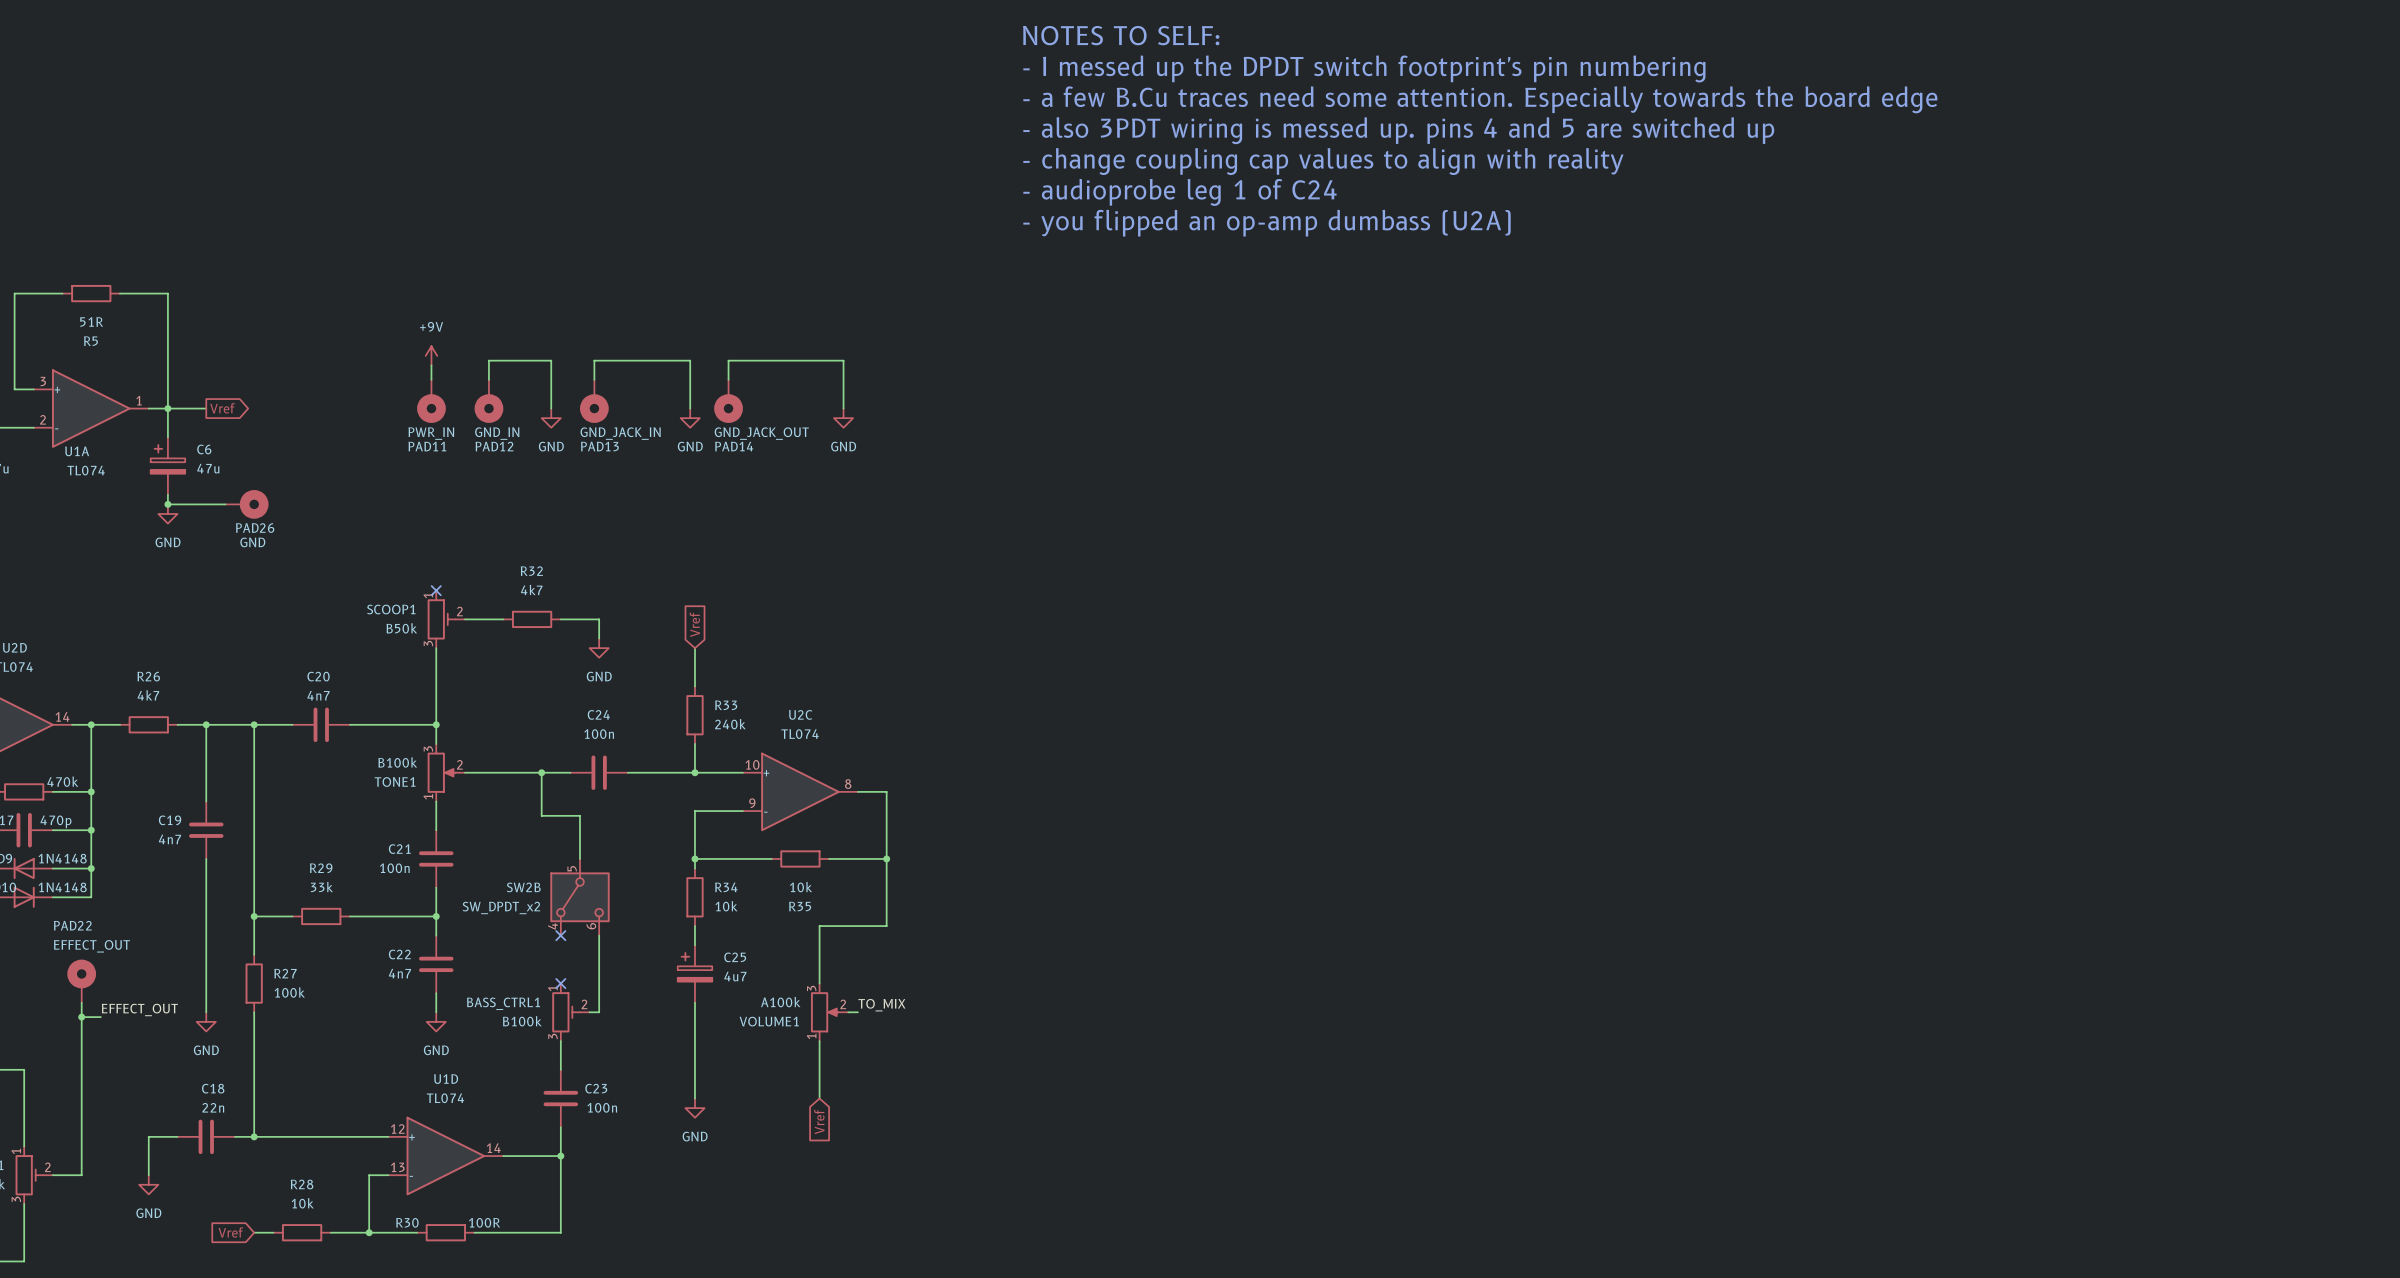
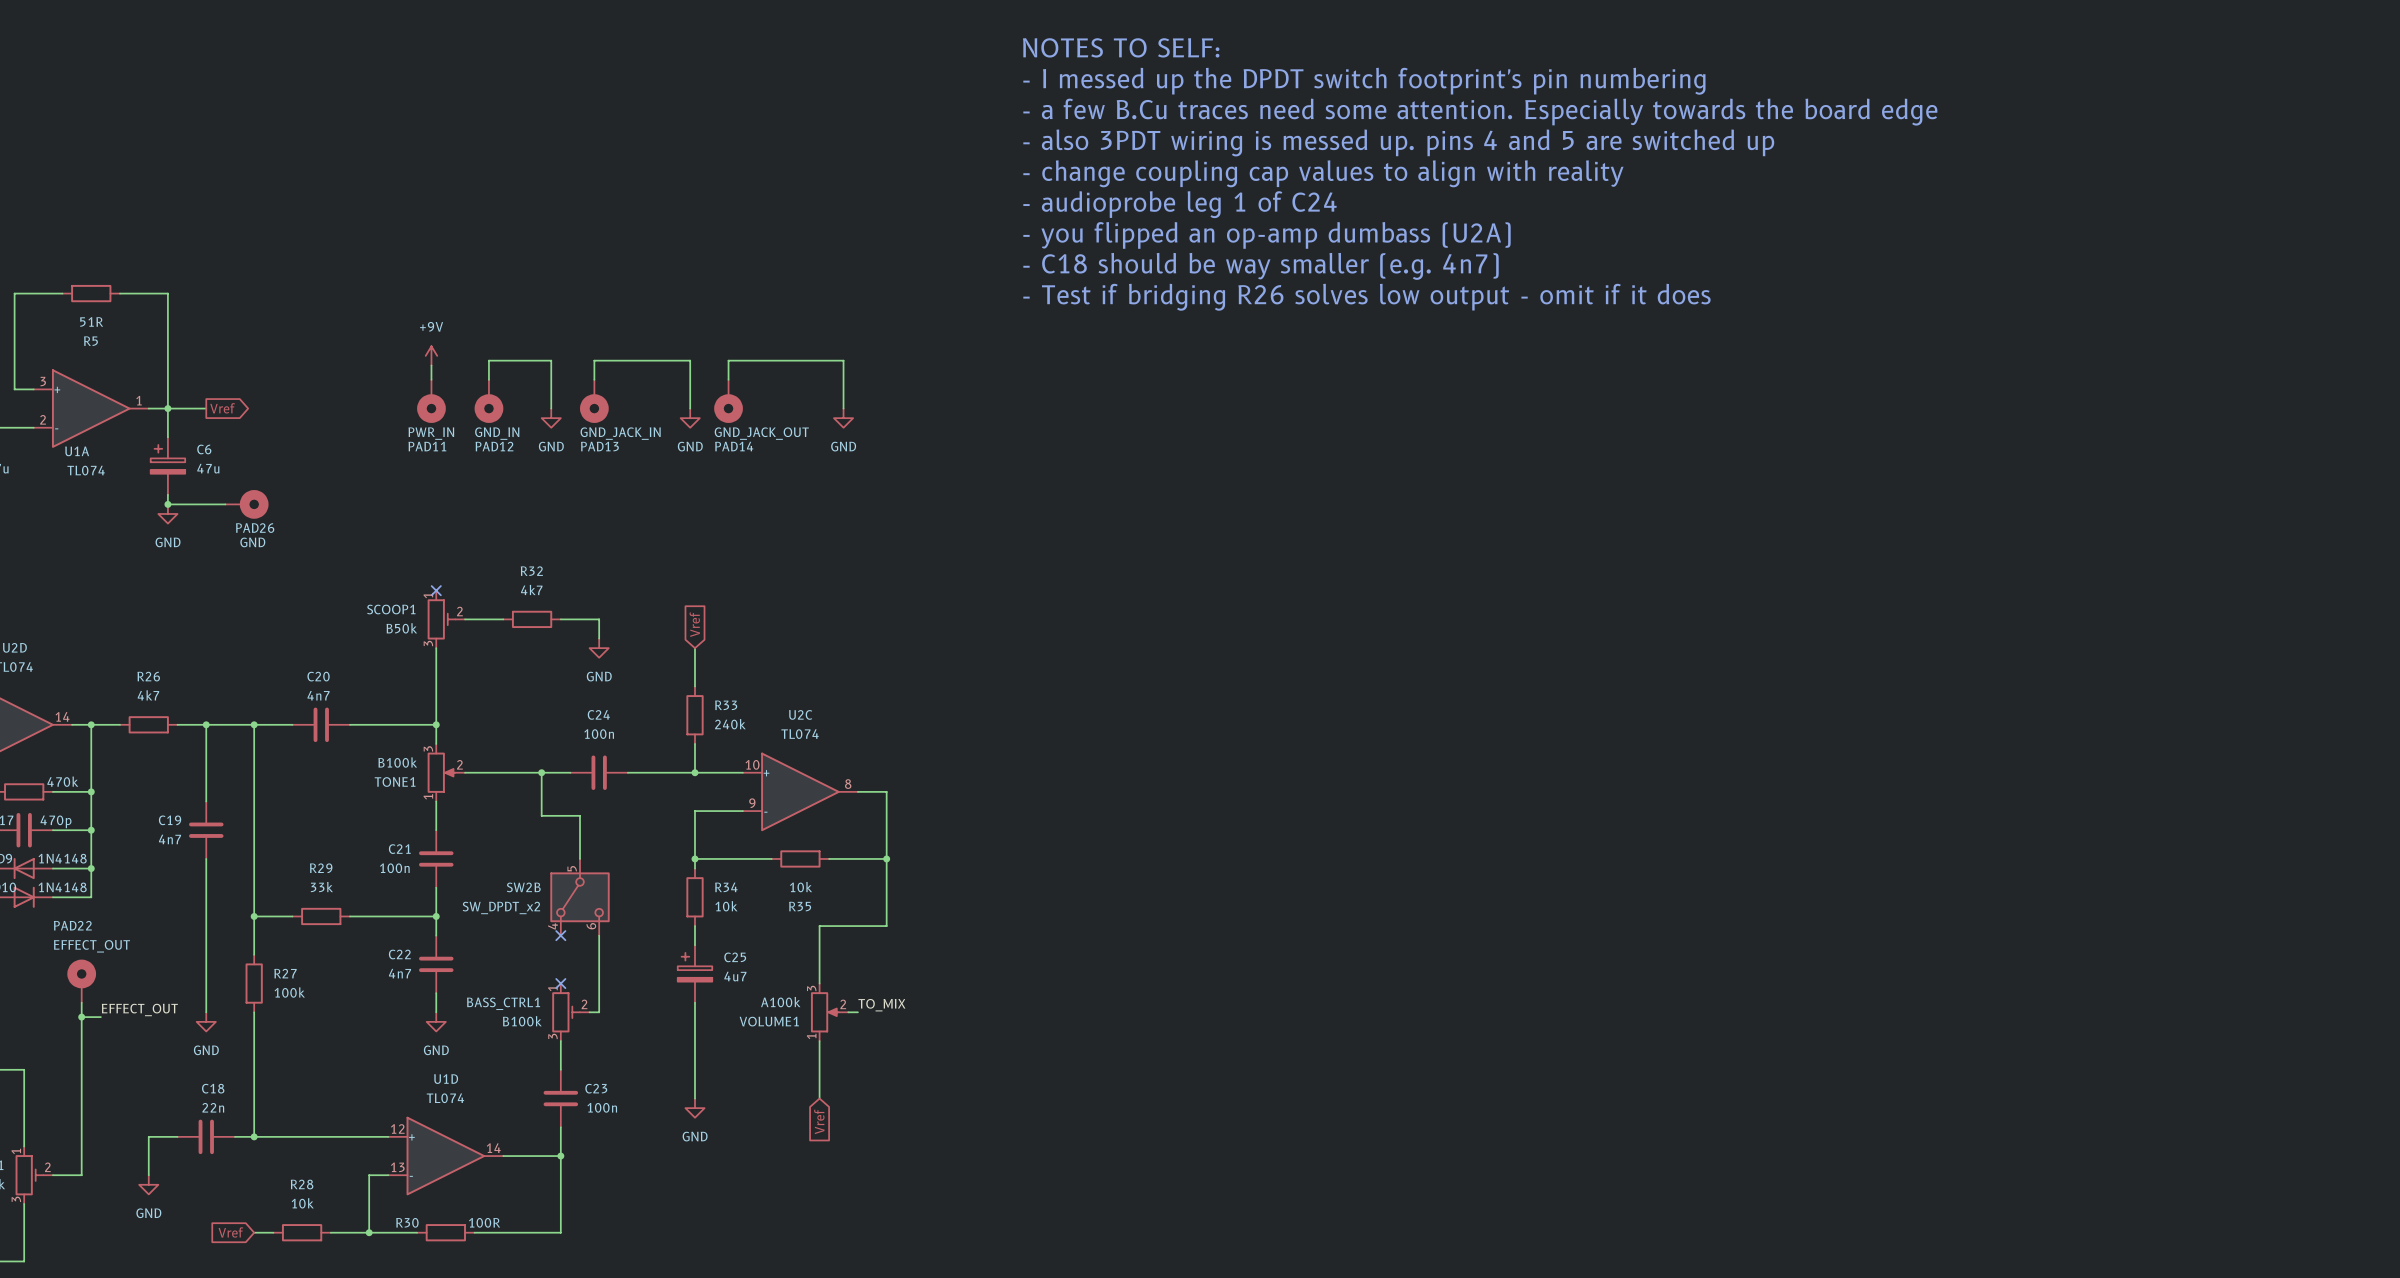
text position: NOTES TO SELF: (1121, 35) -> NOTES TO SELF: (1121, 47)
text position: - I messed up the DPDT switch footprint's pin numbering (1364, 68) -> - I messed up the DPDT switch footprint's pin numbering (1364, 81)
text position: - a few B.Cu traces need some attention. Especially towards the board edge (1480, 99) -> - a few B.Cu traces need some attention. Especially towards the board edge (1480, 112)
text position: - also 3PDT wiring is messed up. pins 4 and 5 are switched up (1398, 130) -> - also 3PDT wiring is messed up. pins 4 and 5 are switched up (1398, 142)
text position: - change coupling cap values to align with reality (1323, 161) -> - change coupling cap values to align with reality (1323, 173)
text position: - audioprobe leg 1 of C24 (1180, 192) -> - audioprobe leg 1 of C24 (1180, 204)
text position: - you flipped an op-amp dumbass (U2A) (1267, 223) -> - you flipped an op-amp dumbass (U2A) (1267, 235)
text: none -> - C18 should be way smaller (e.g. 4n7) (1261, 266)
text: none -> - Test if bridging R26 solves low output - omit if it does (1366, 297)

